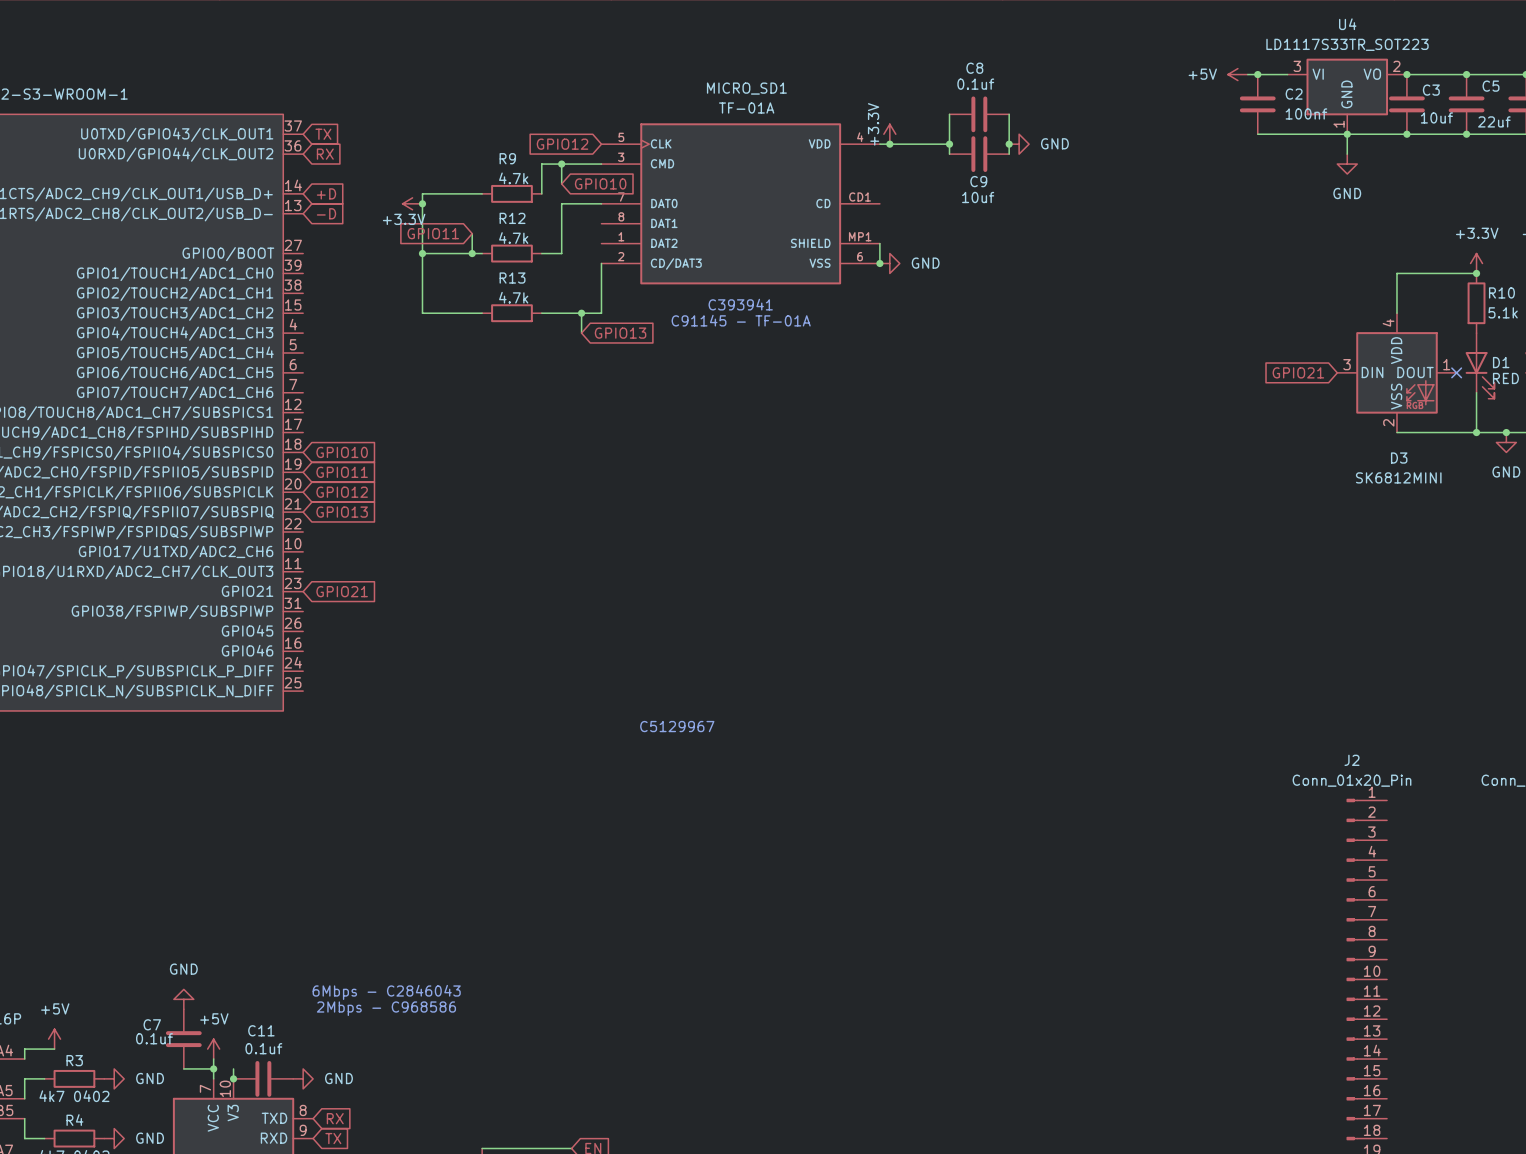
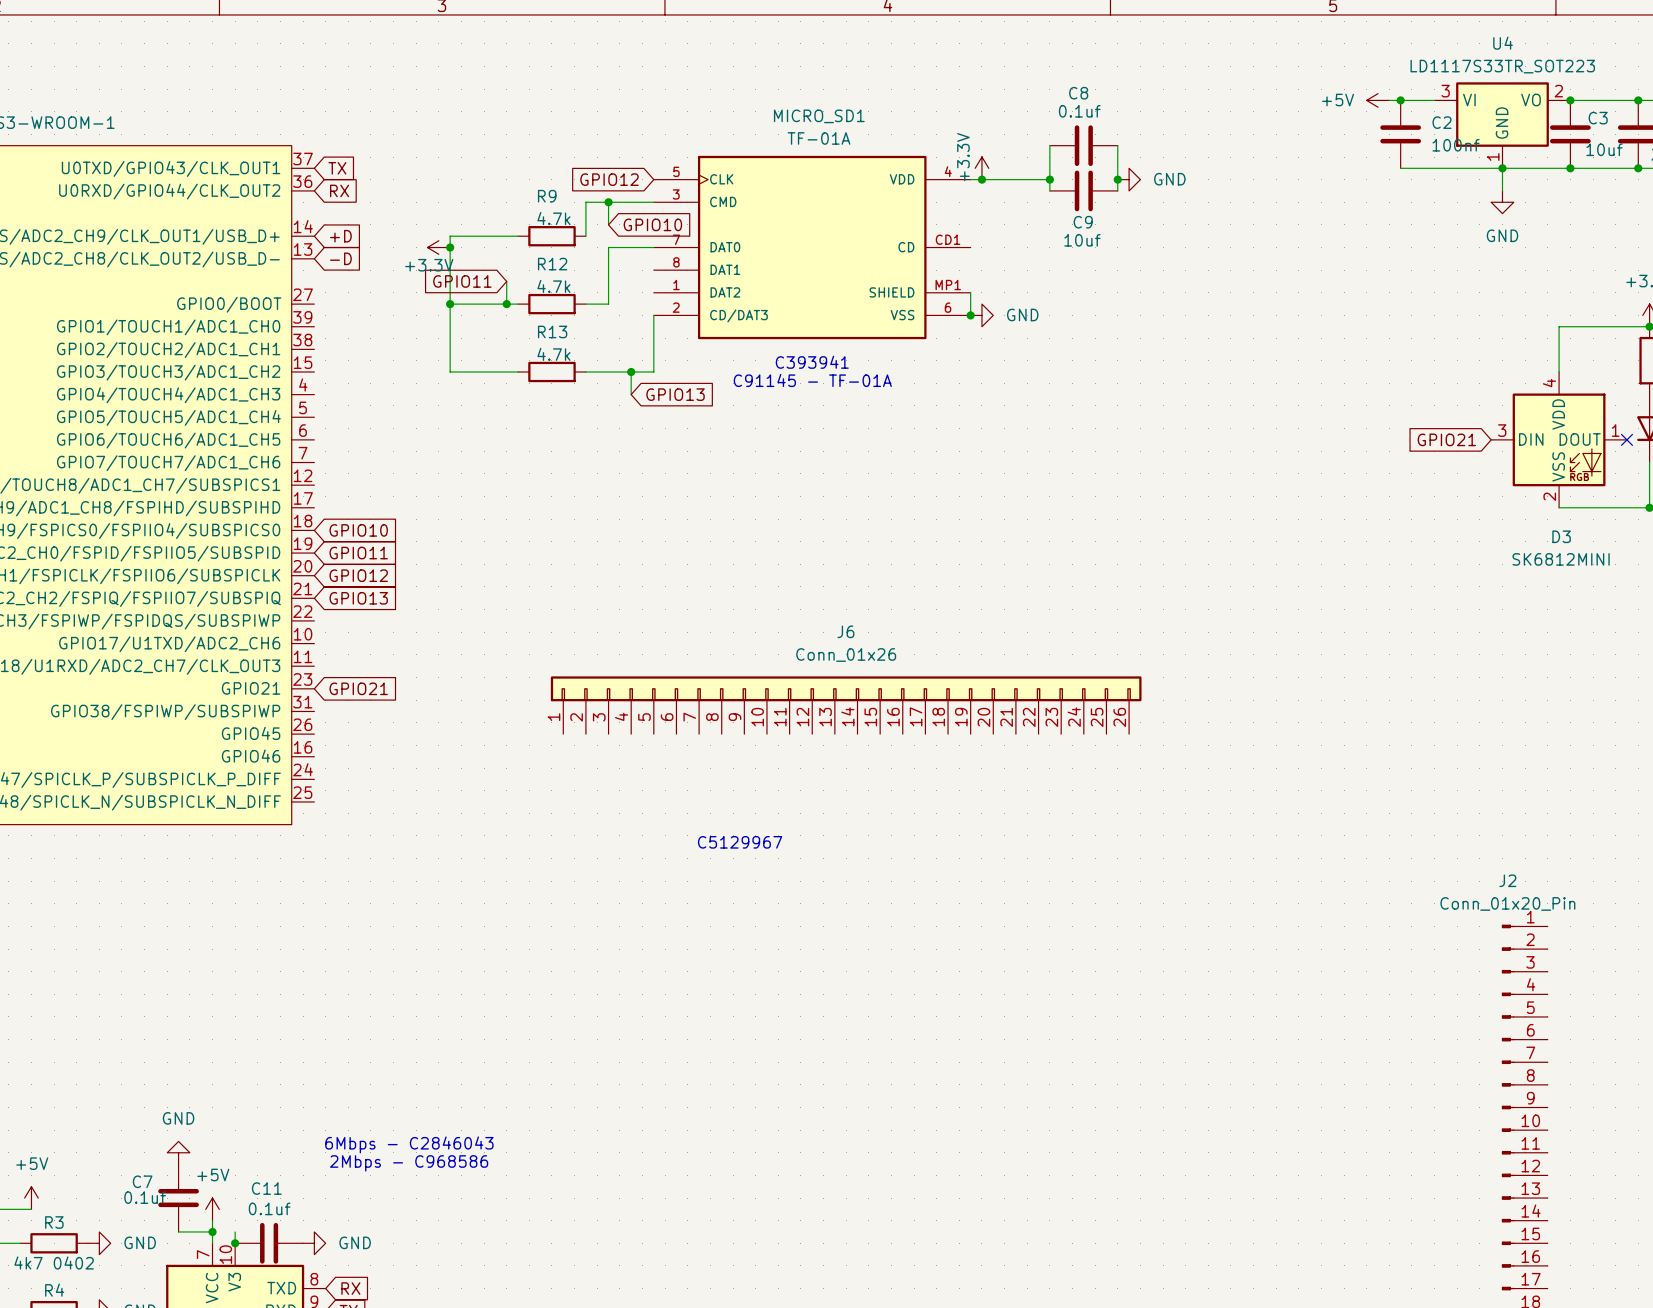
J6: none -> Conn_01x26 (846, 705)

